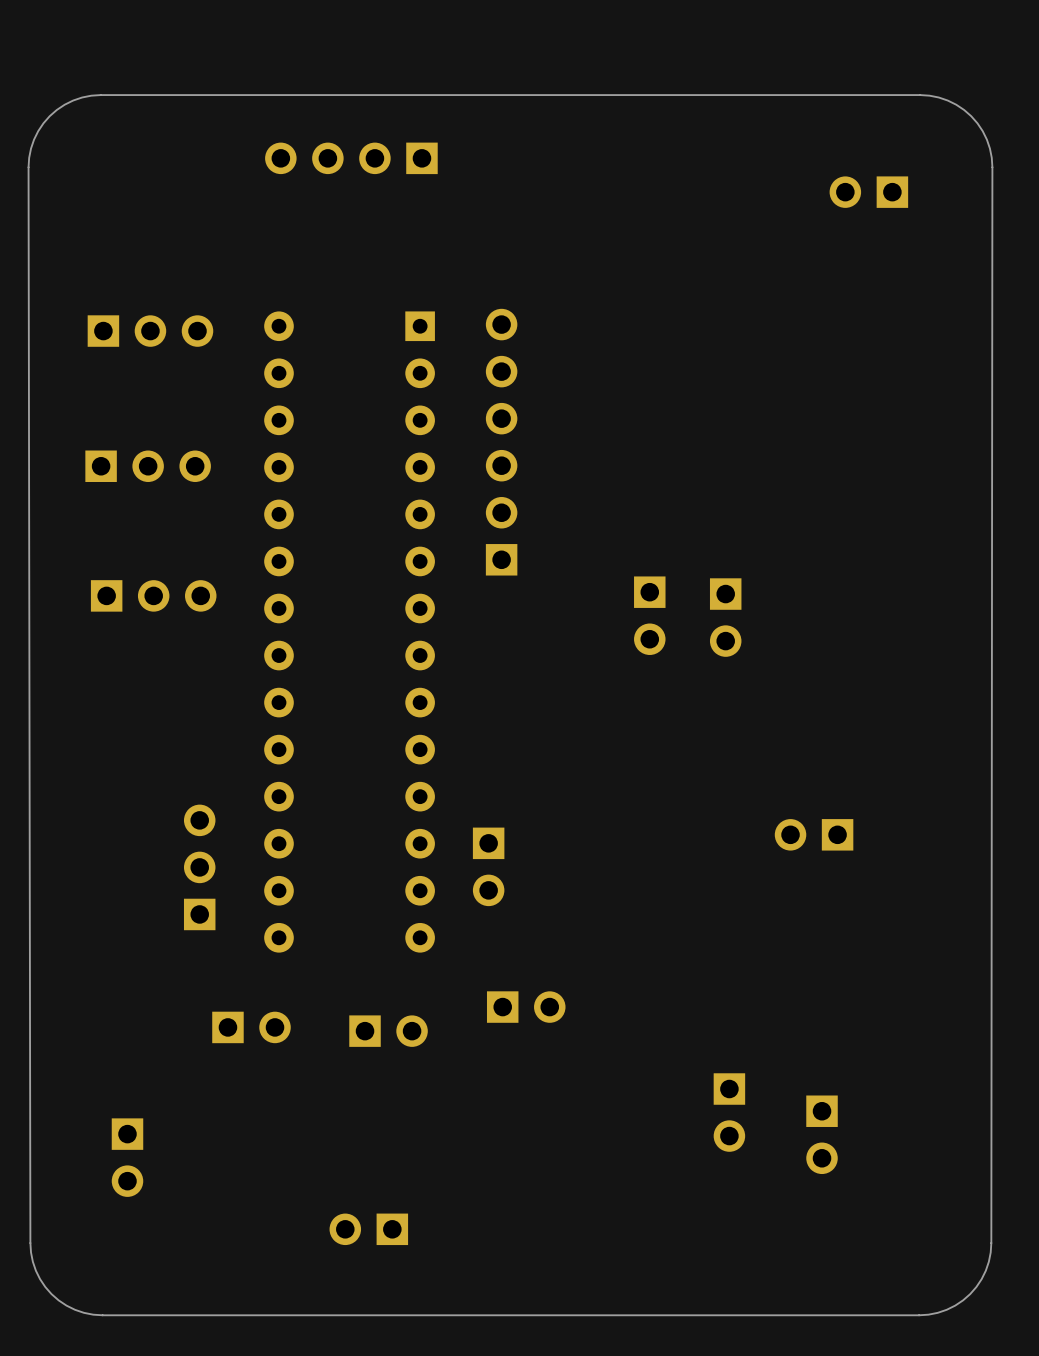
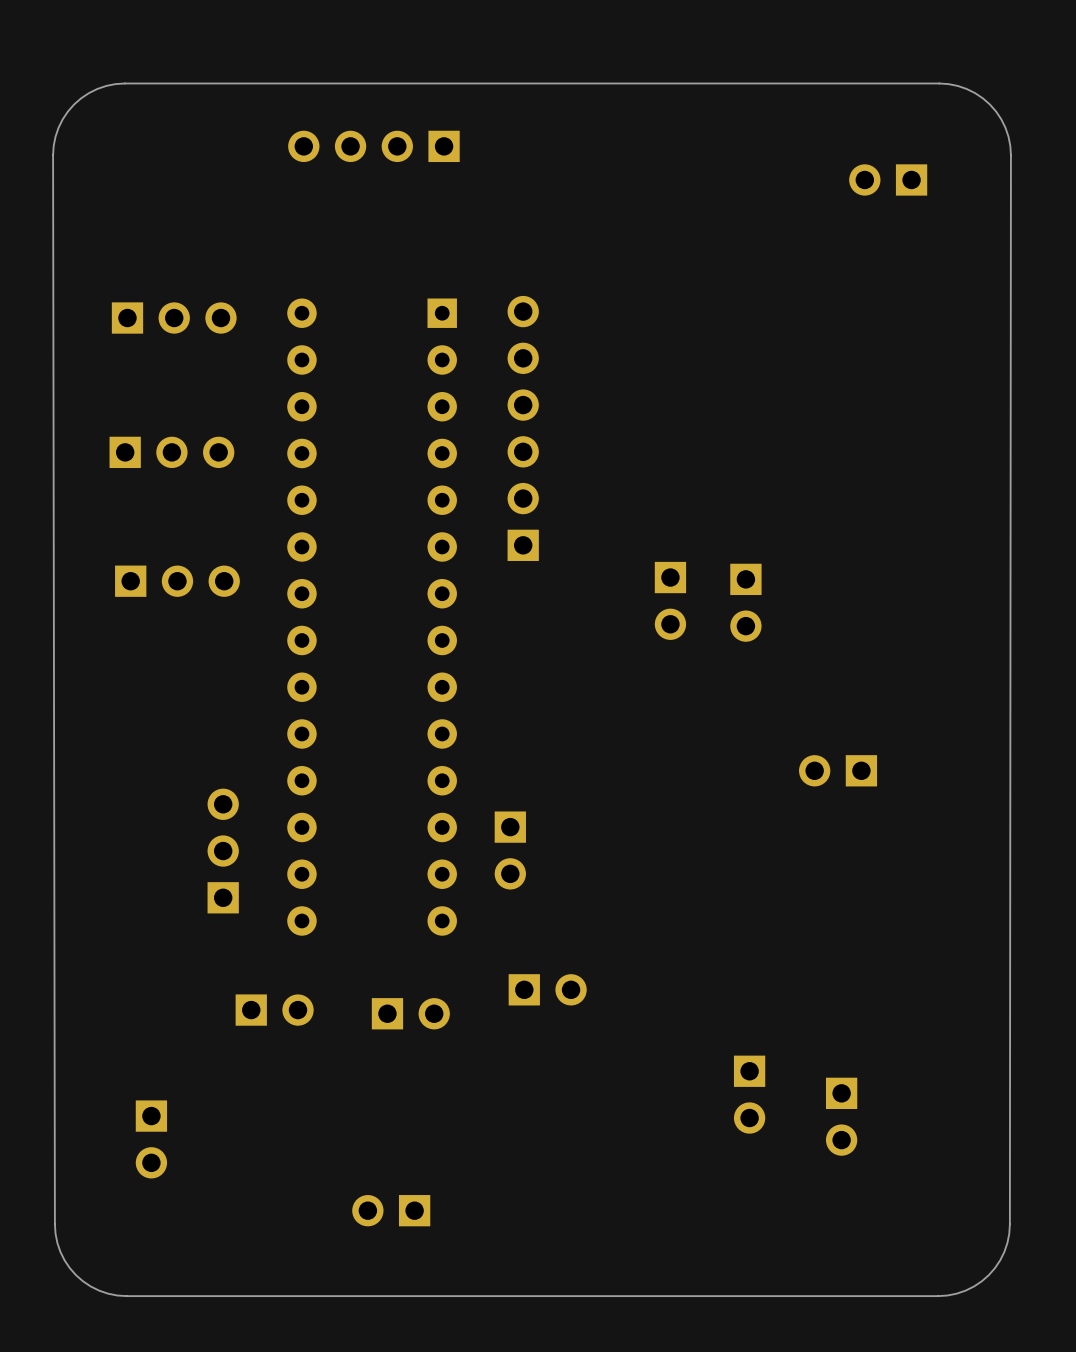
part position: (814, 834) -> (838, 770)

